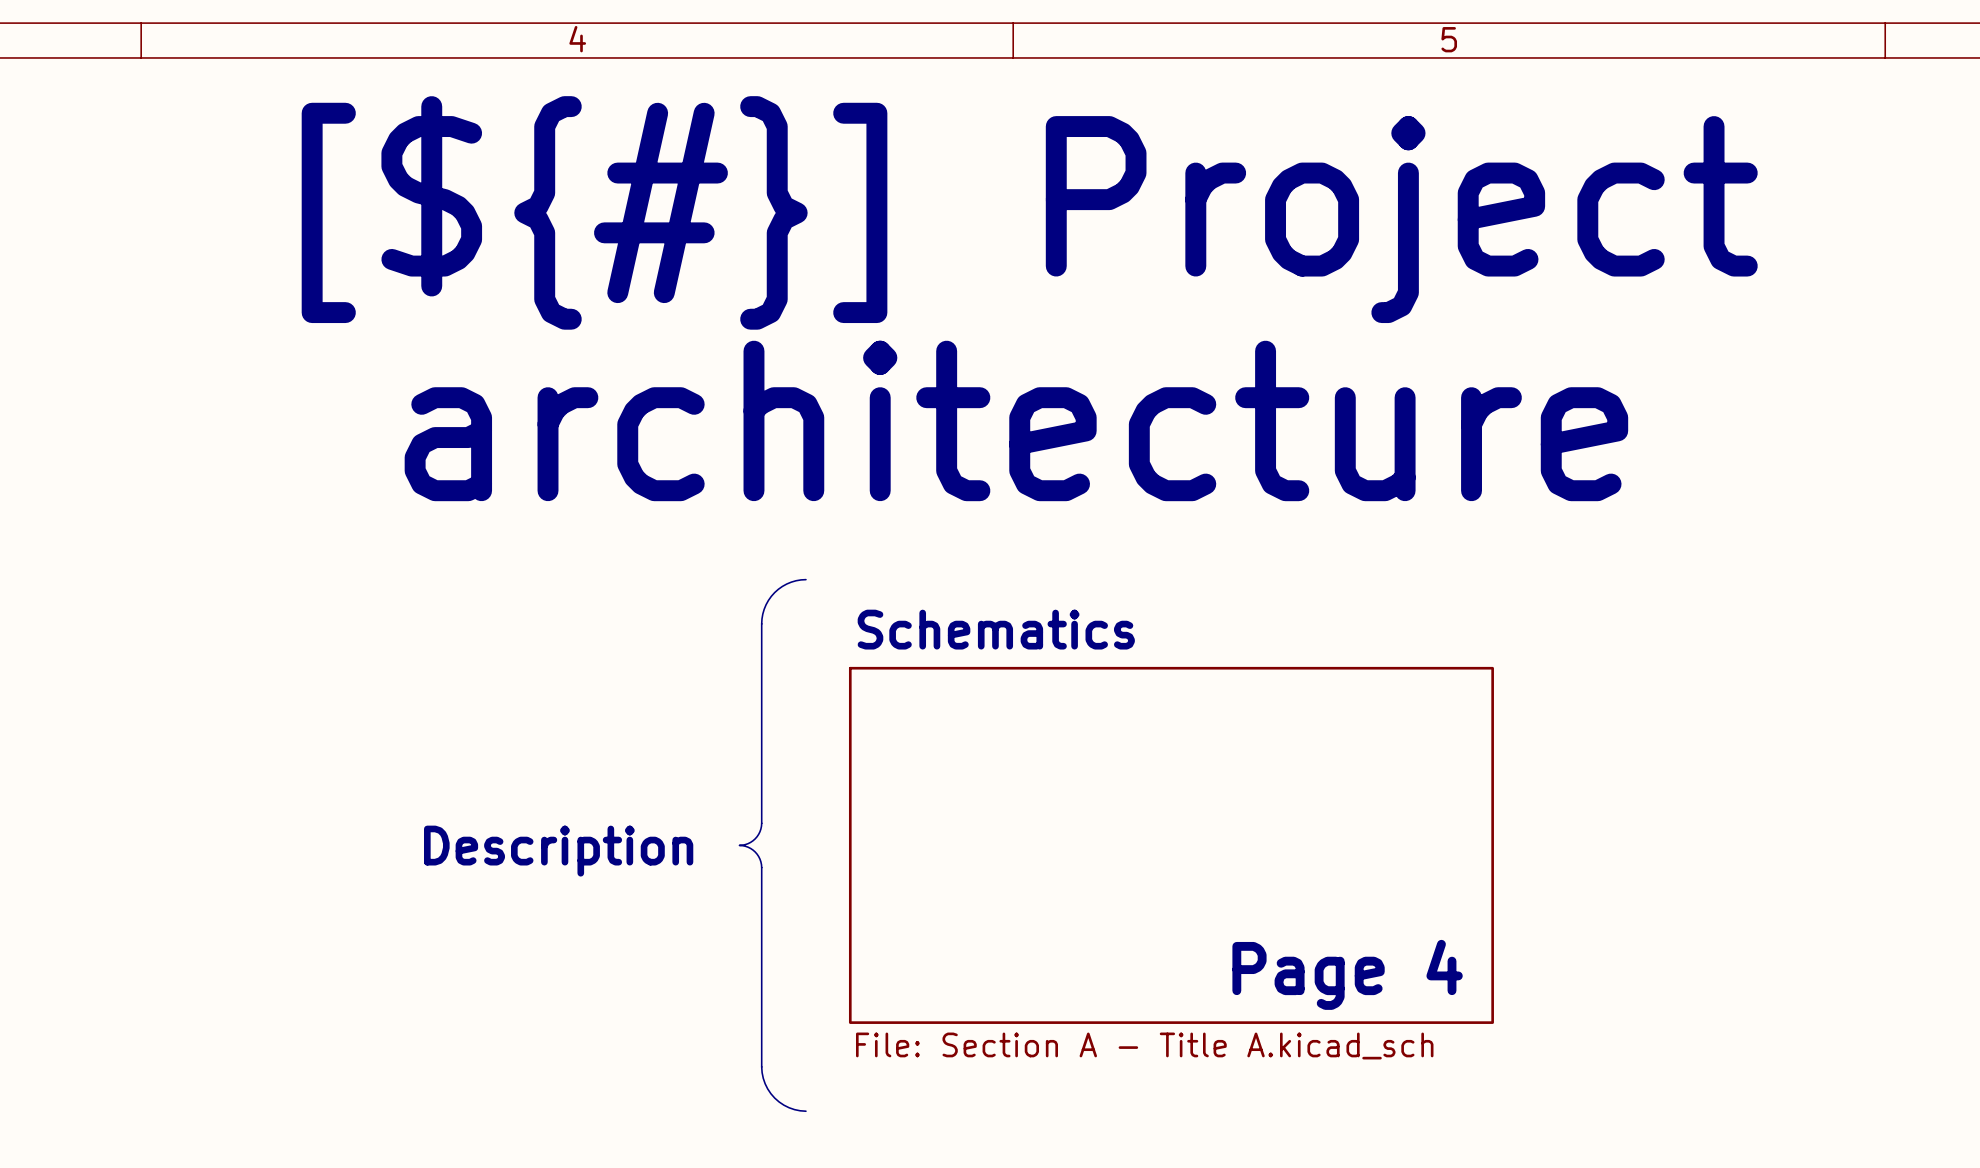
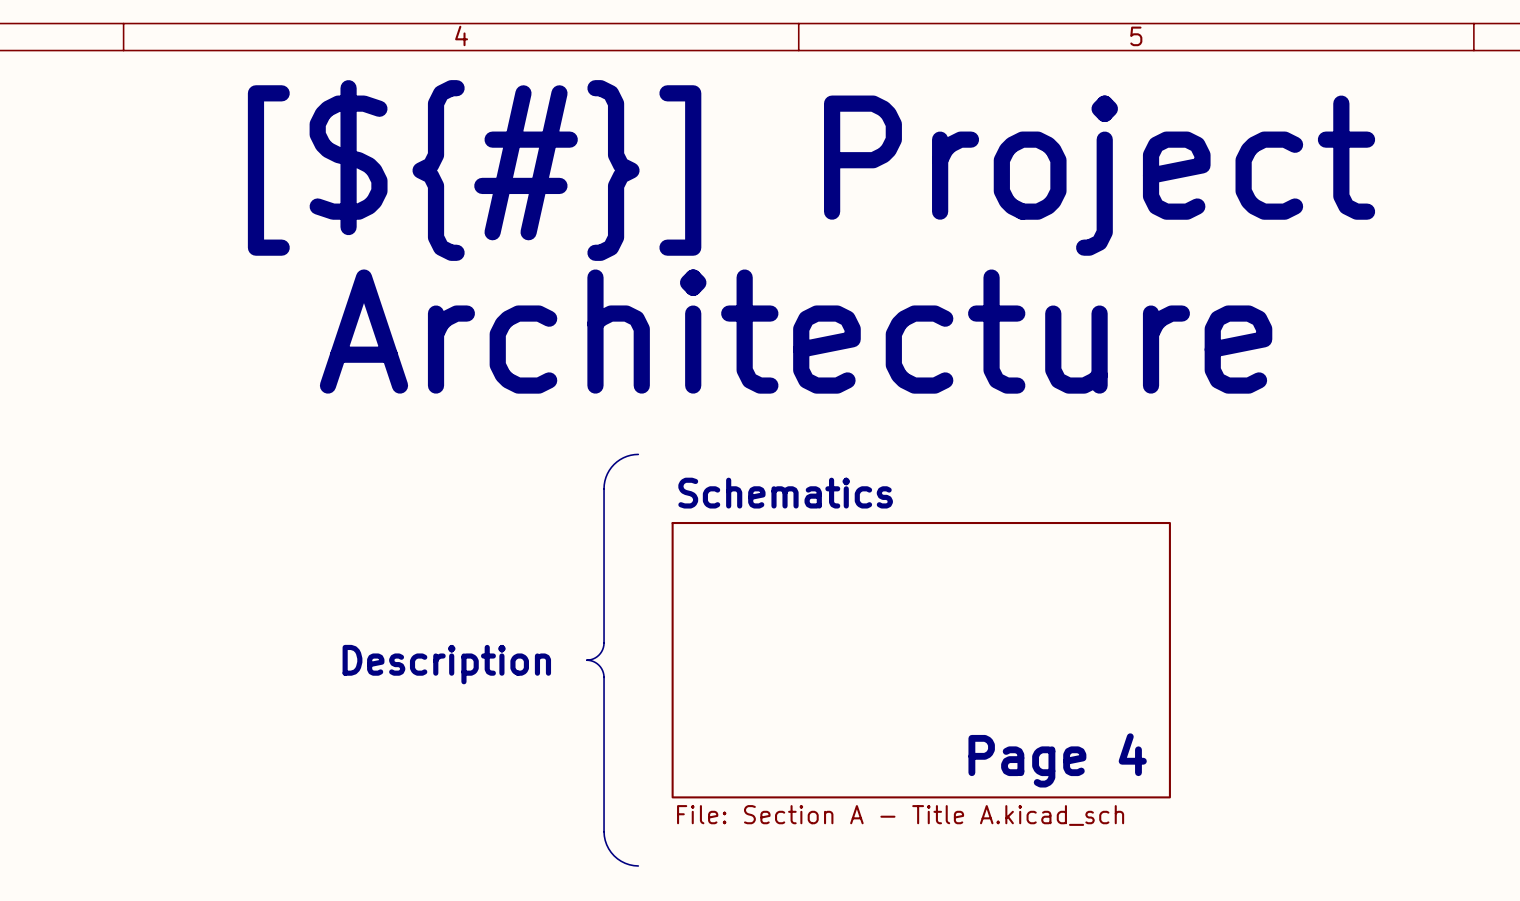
text: architecture (1016, 420) -> Architecture (796, 331)

